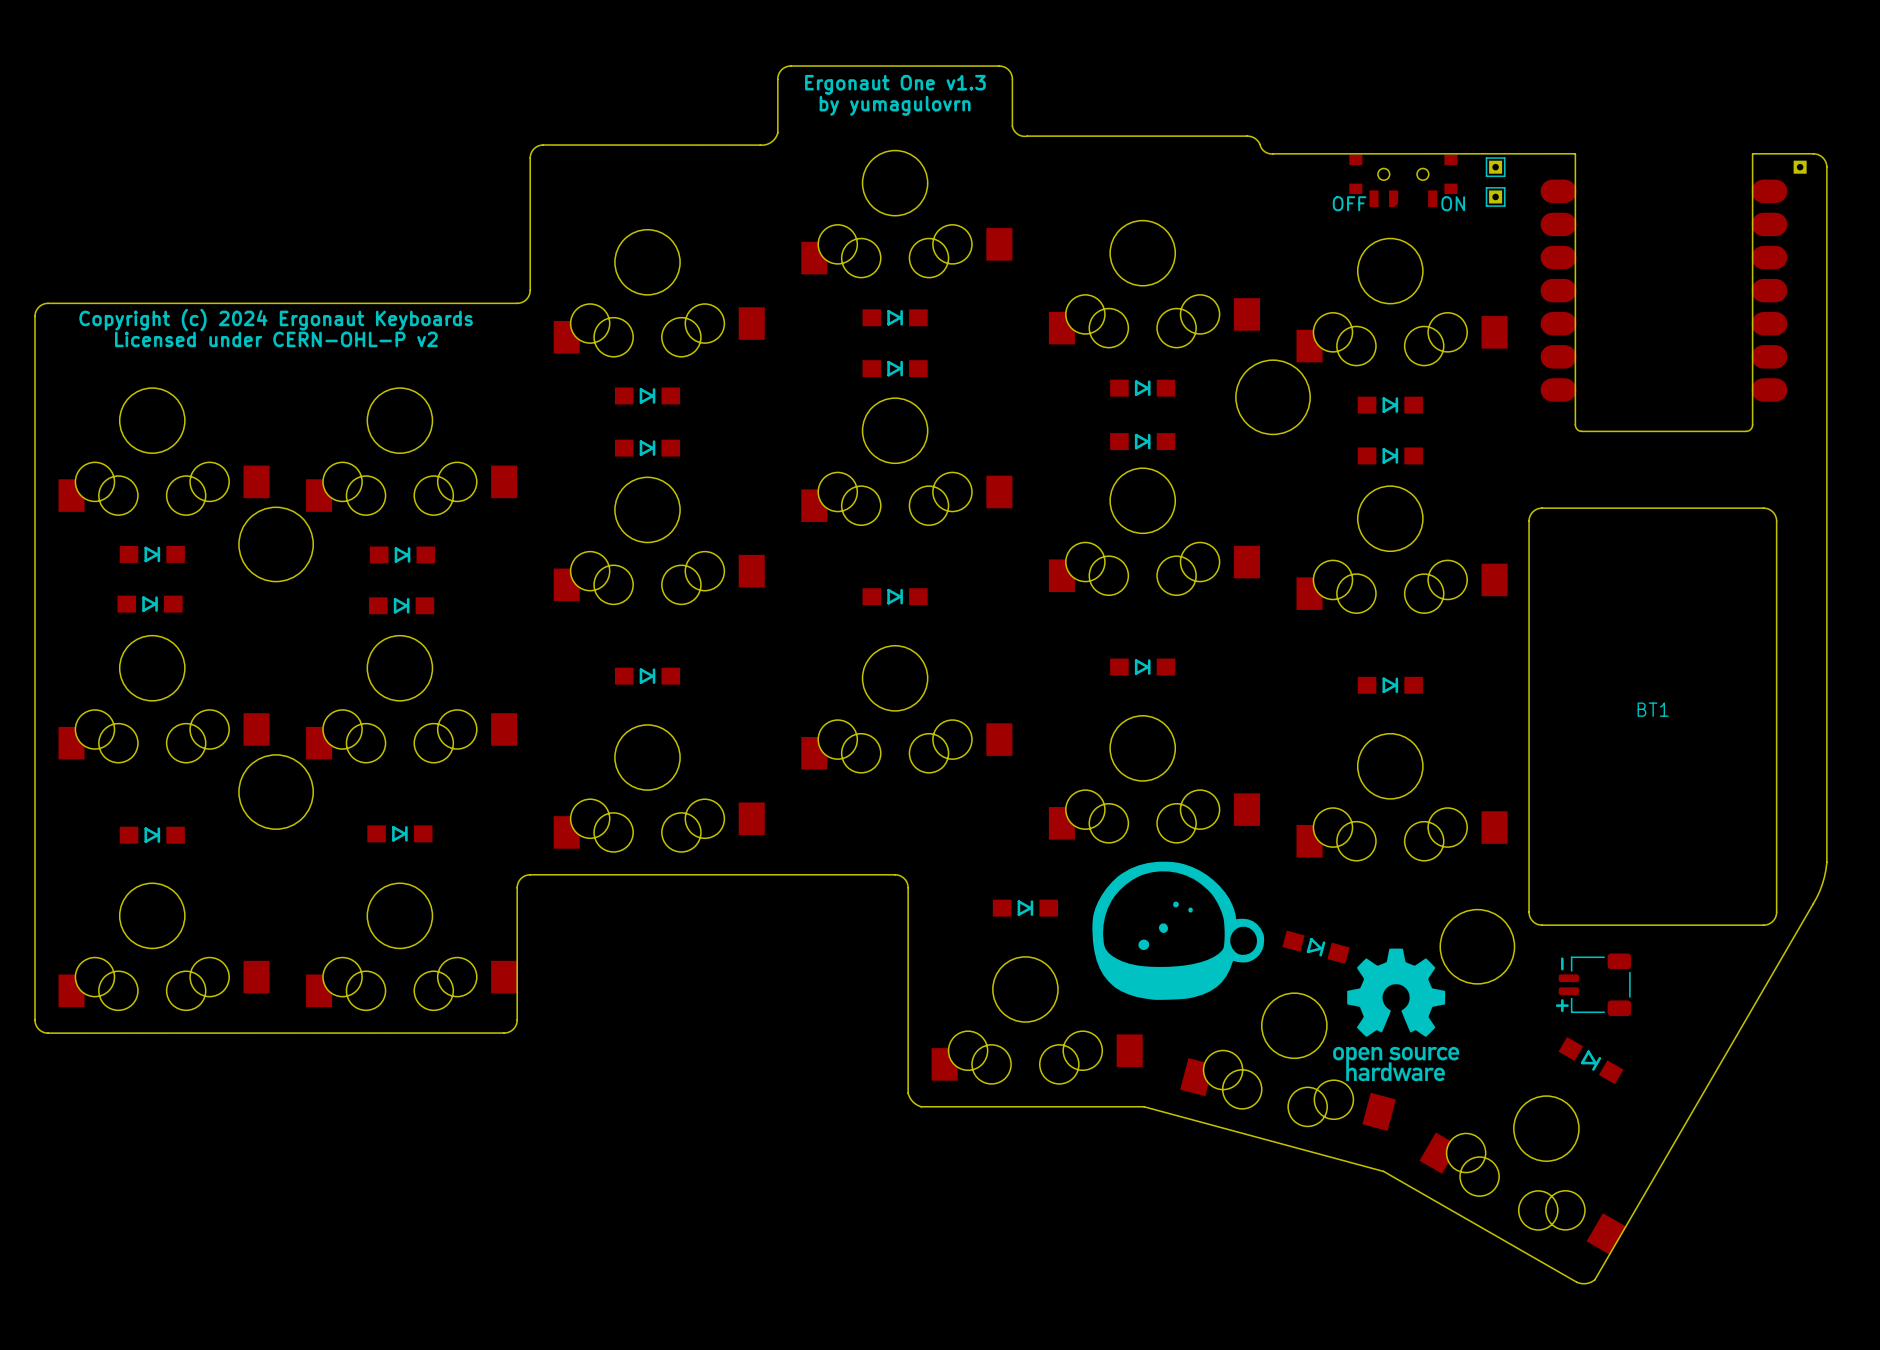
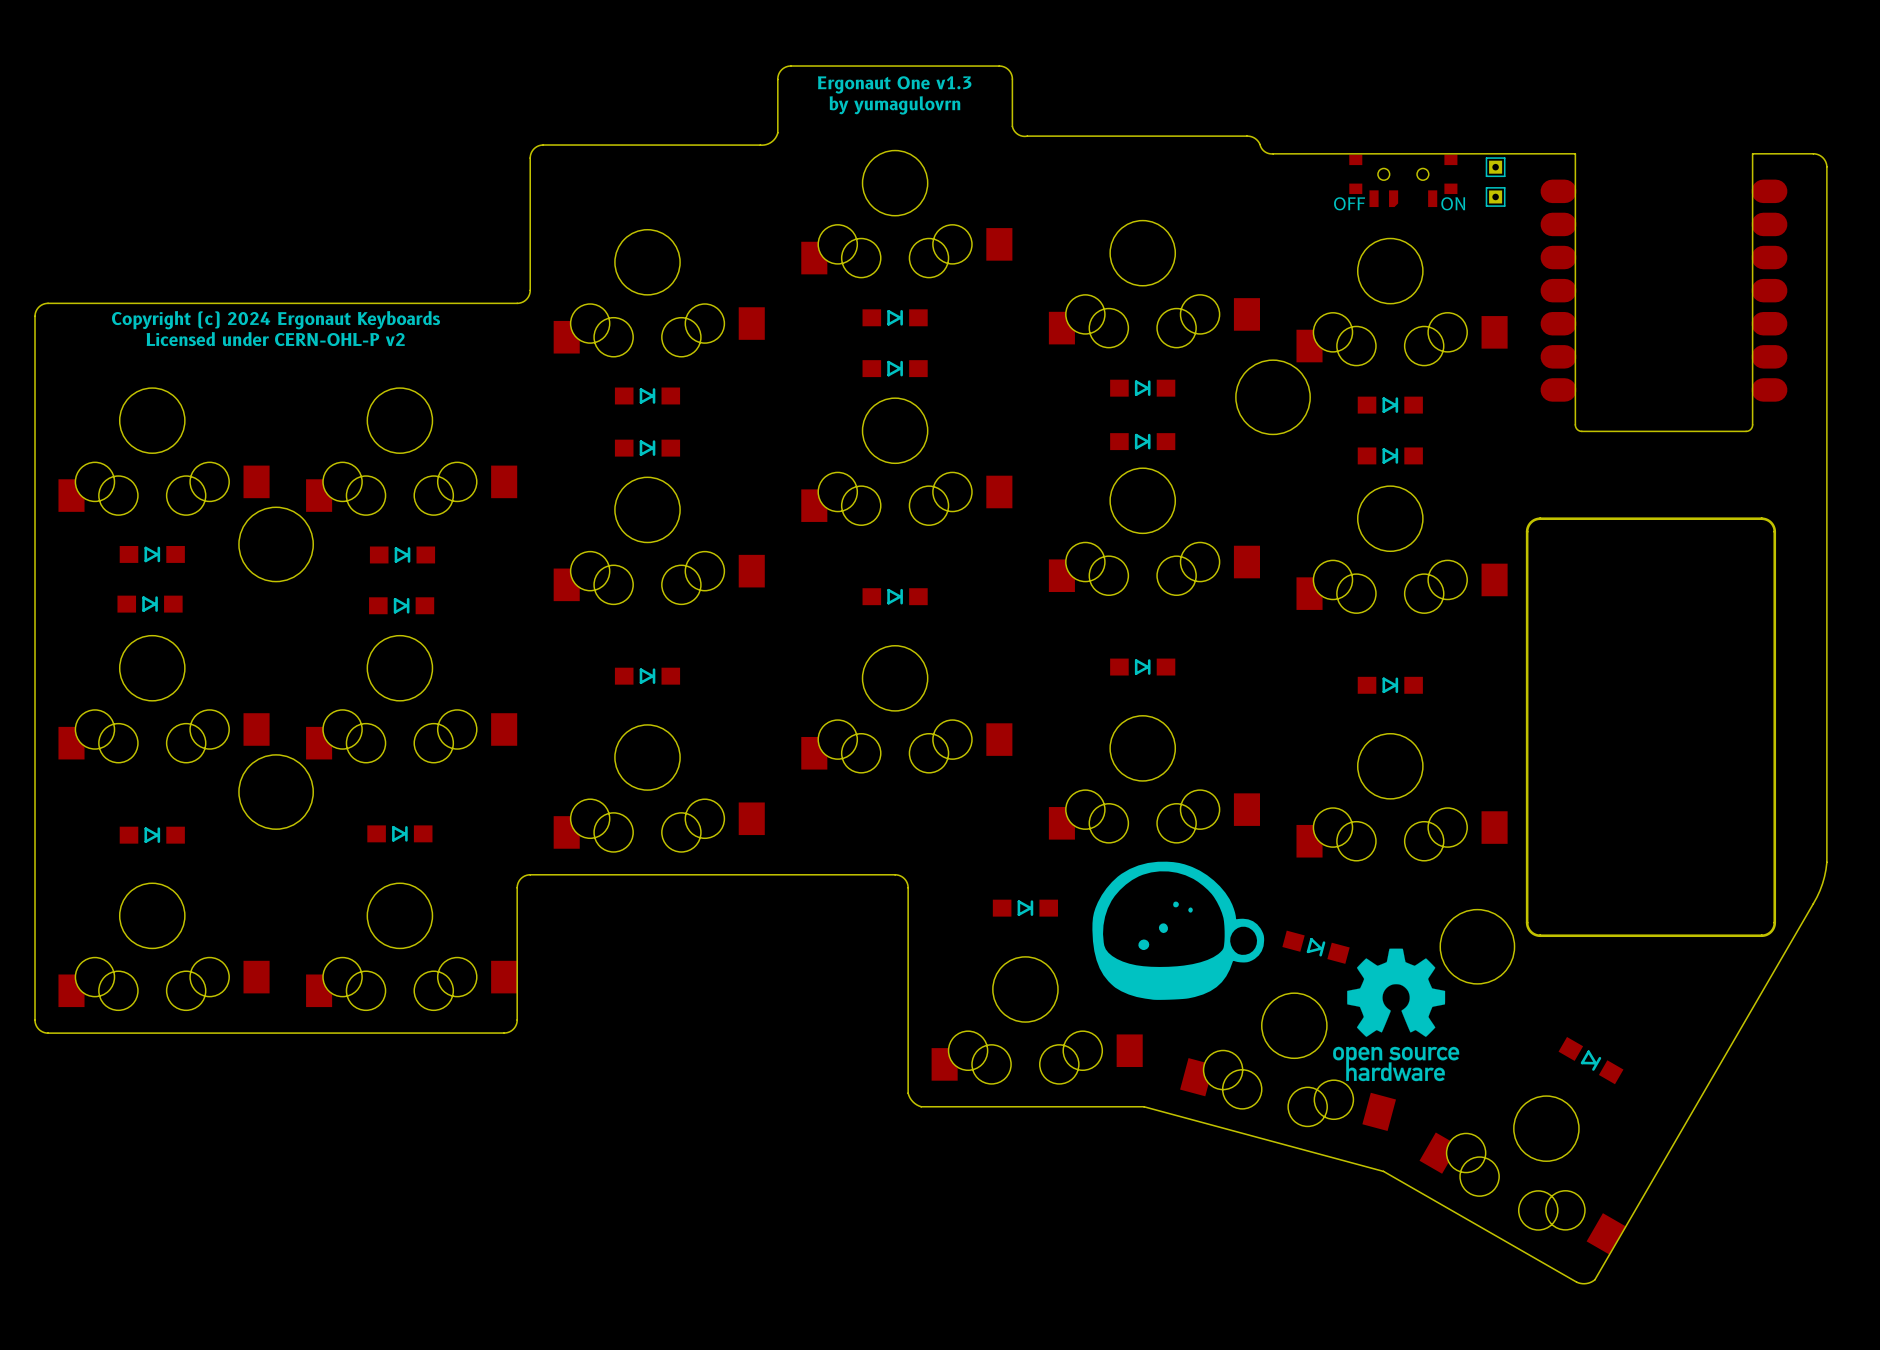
part: (1800, 167) -> none
board edge: none -> (1540, 518) (1761, 518) (1768, 520) (1773, 525) (1774, 531) (1774, 922) (1772, 929) (1767, 934) (1540, 935) (1533, 933) (1528, 928) (1527, 531) (1530, 522) (1540, 518)
BT1: (1652, 716) -> none
part: (1593, 984) -> none

